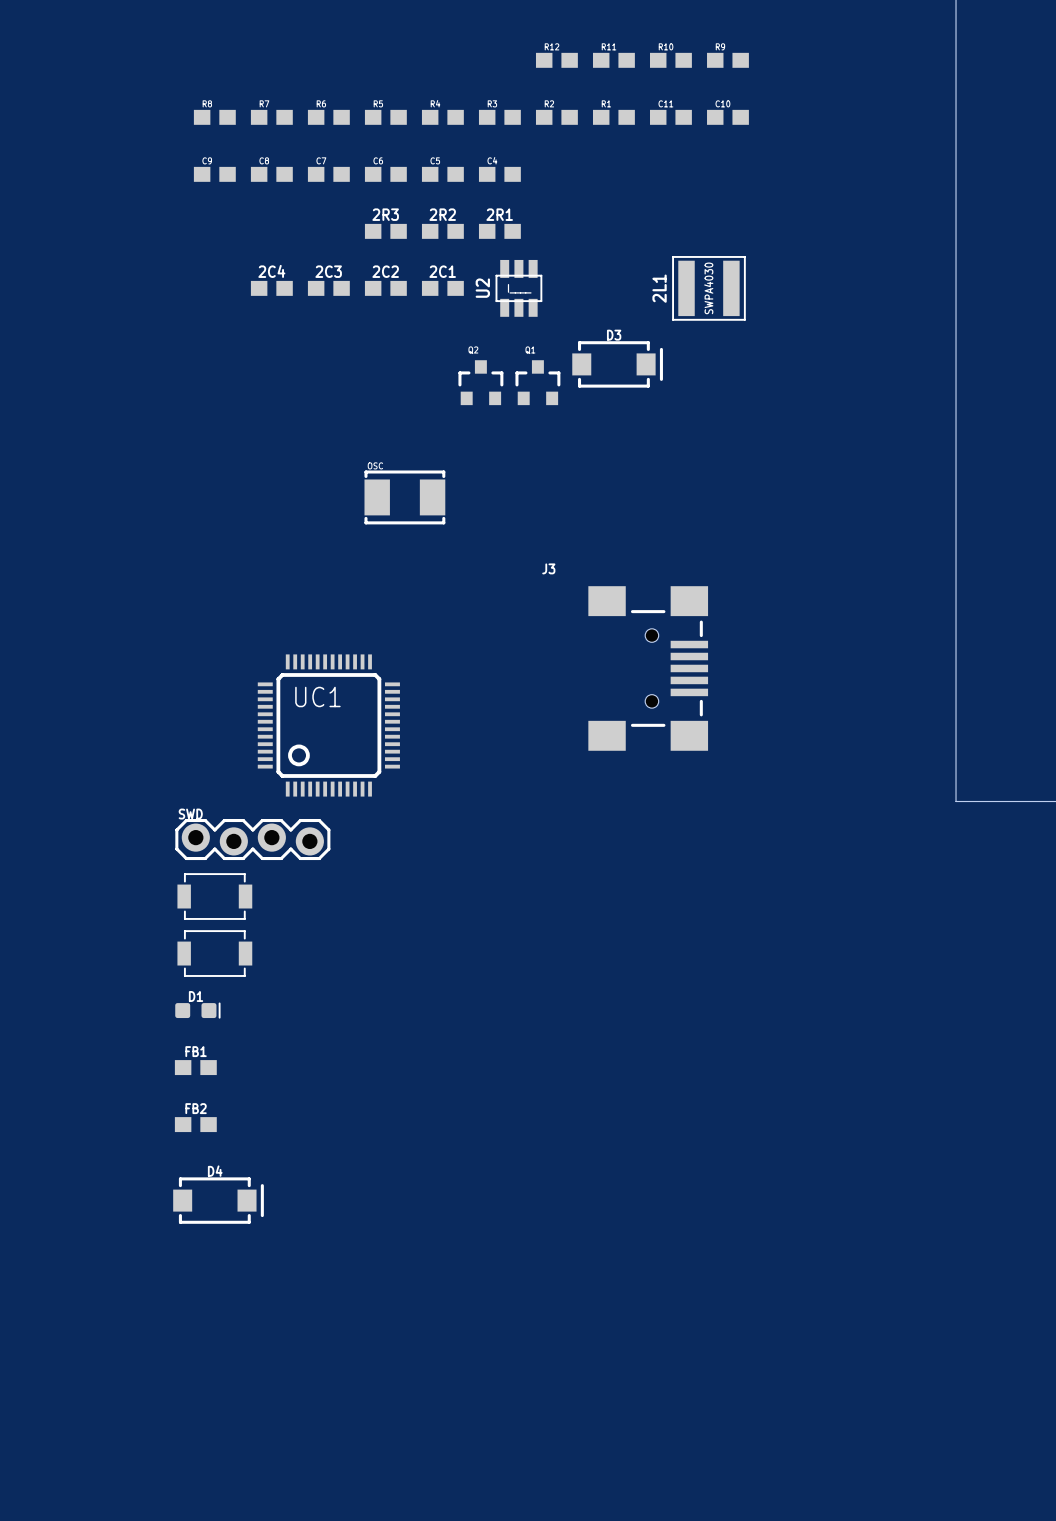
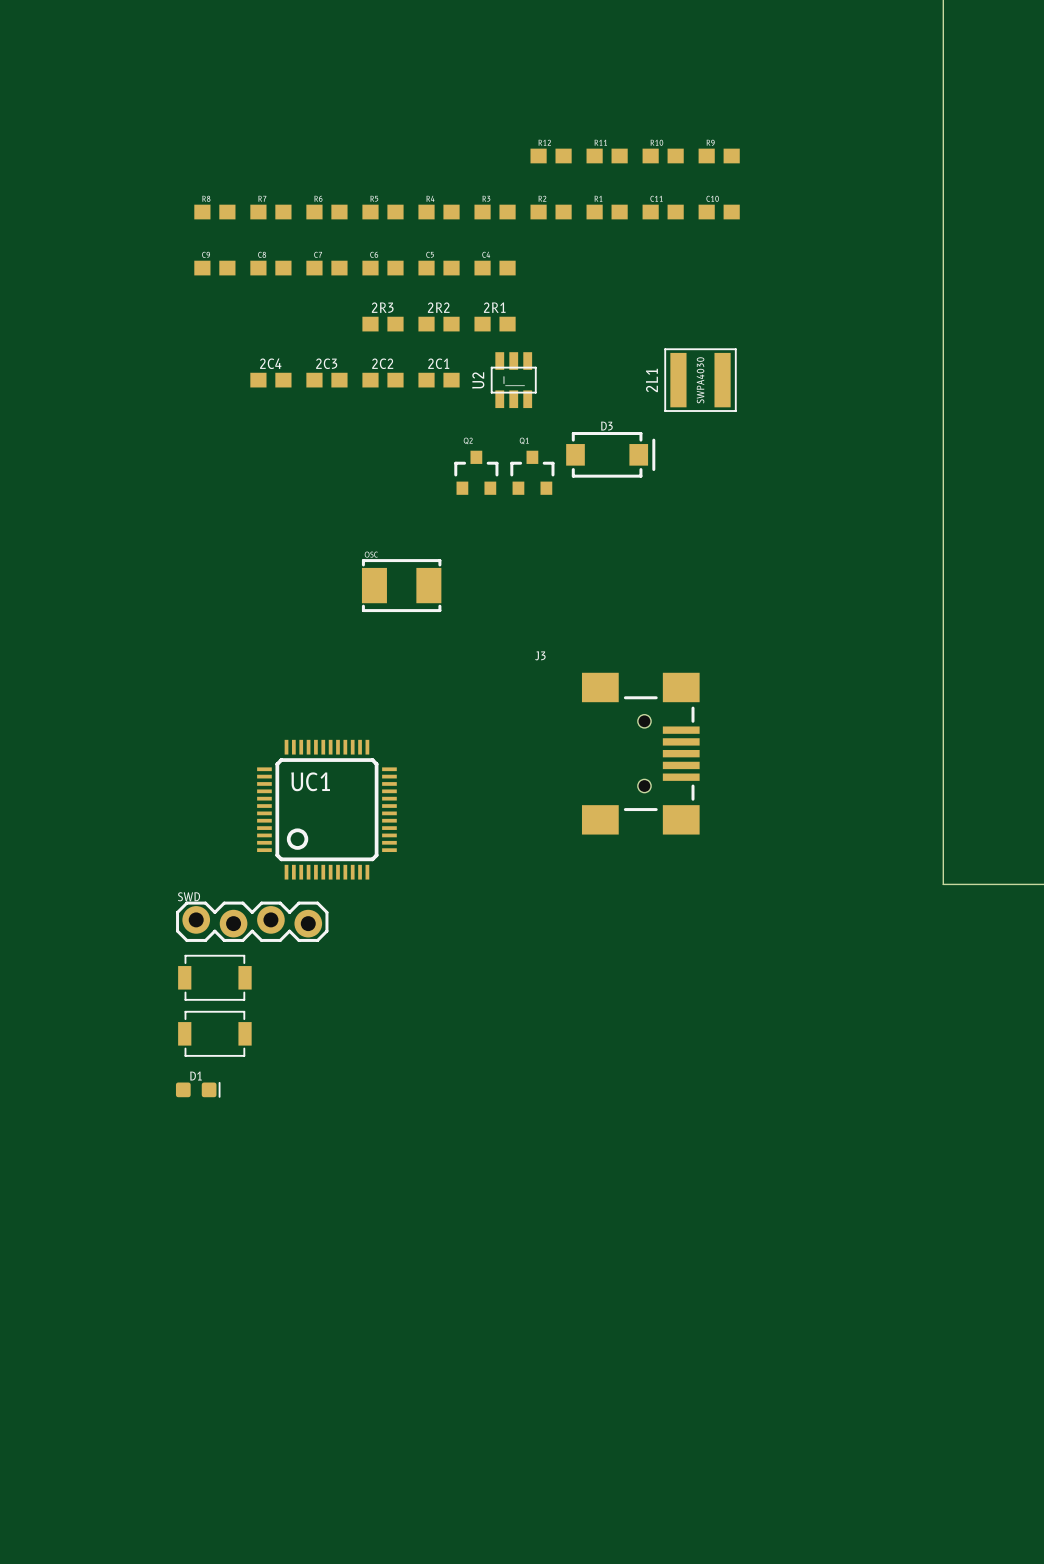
FB1: (195, 1067) -> none
FB2: (195, 1124) -> none
D4: (218, 1200) -> none

